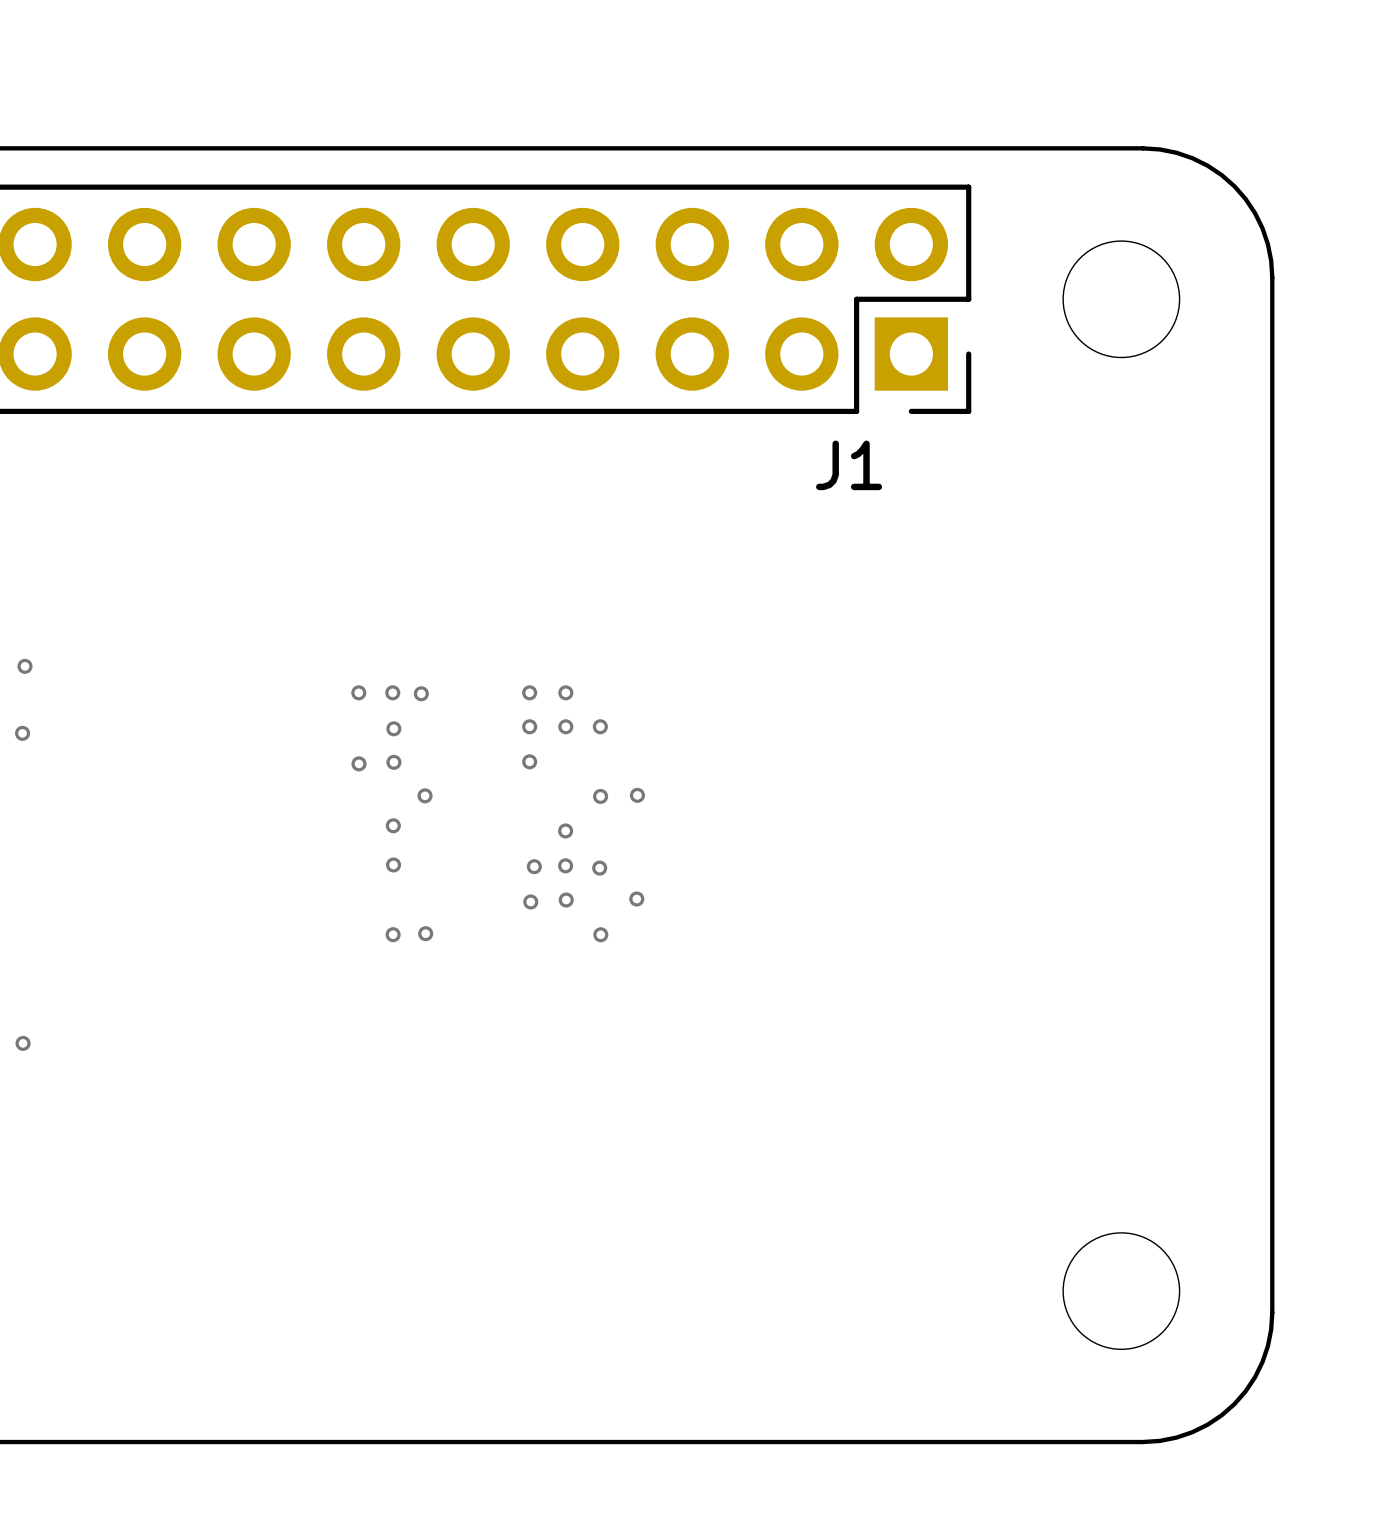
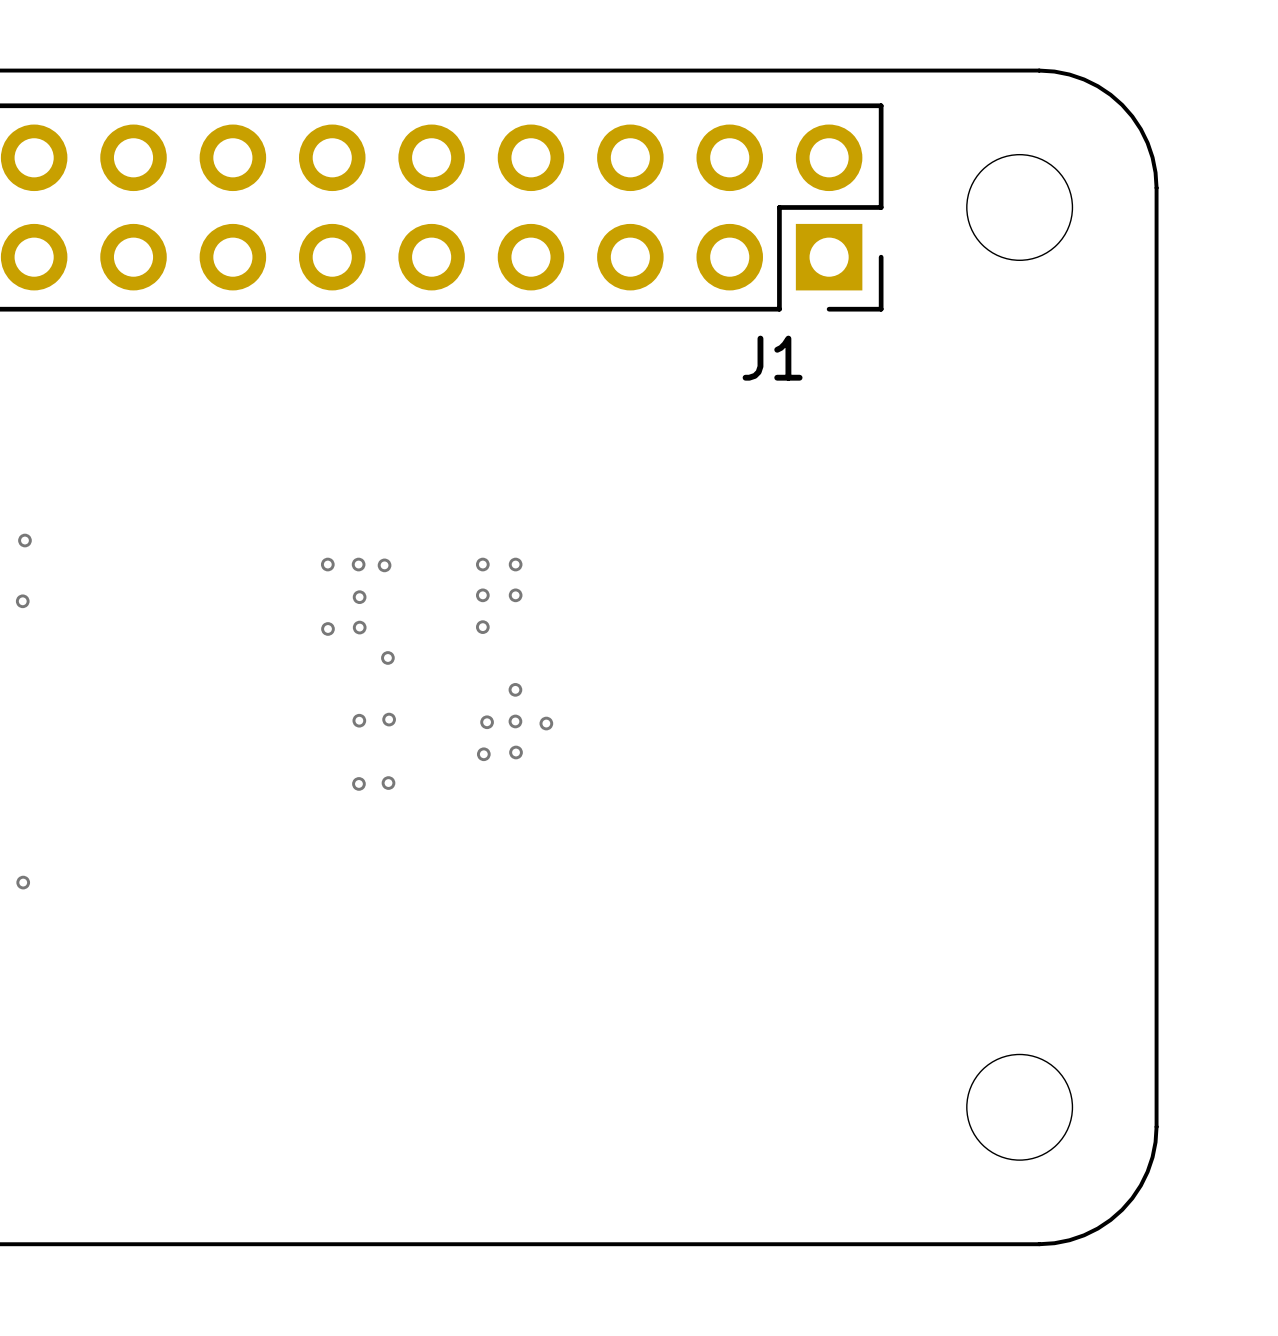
via: (600, 726) -> none
via: (637, 795) -> none
via: (600, 796) -> none
via position: (393, 825) -> (389, 719)
via: (636, 899) -> none
via: (600, 934) -> none

